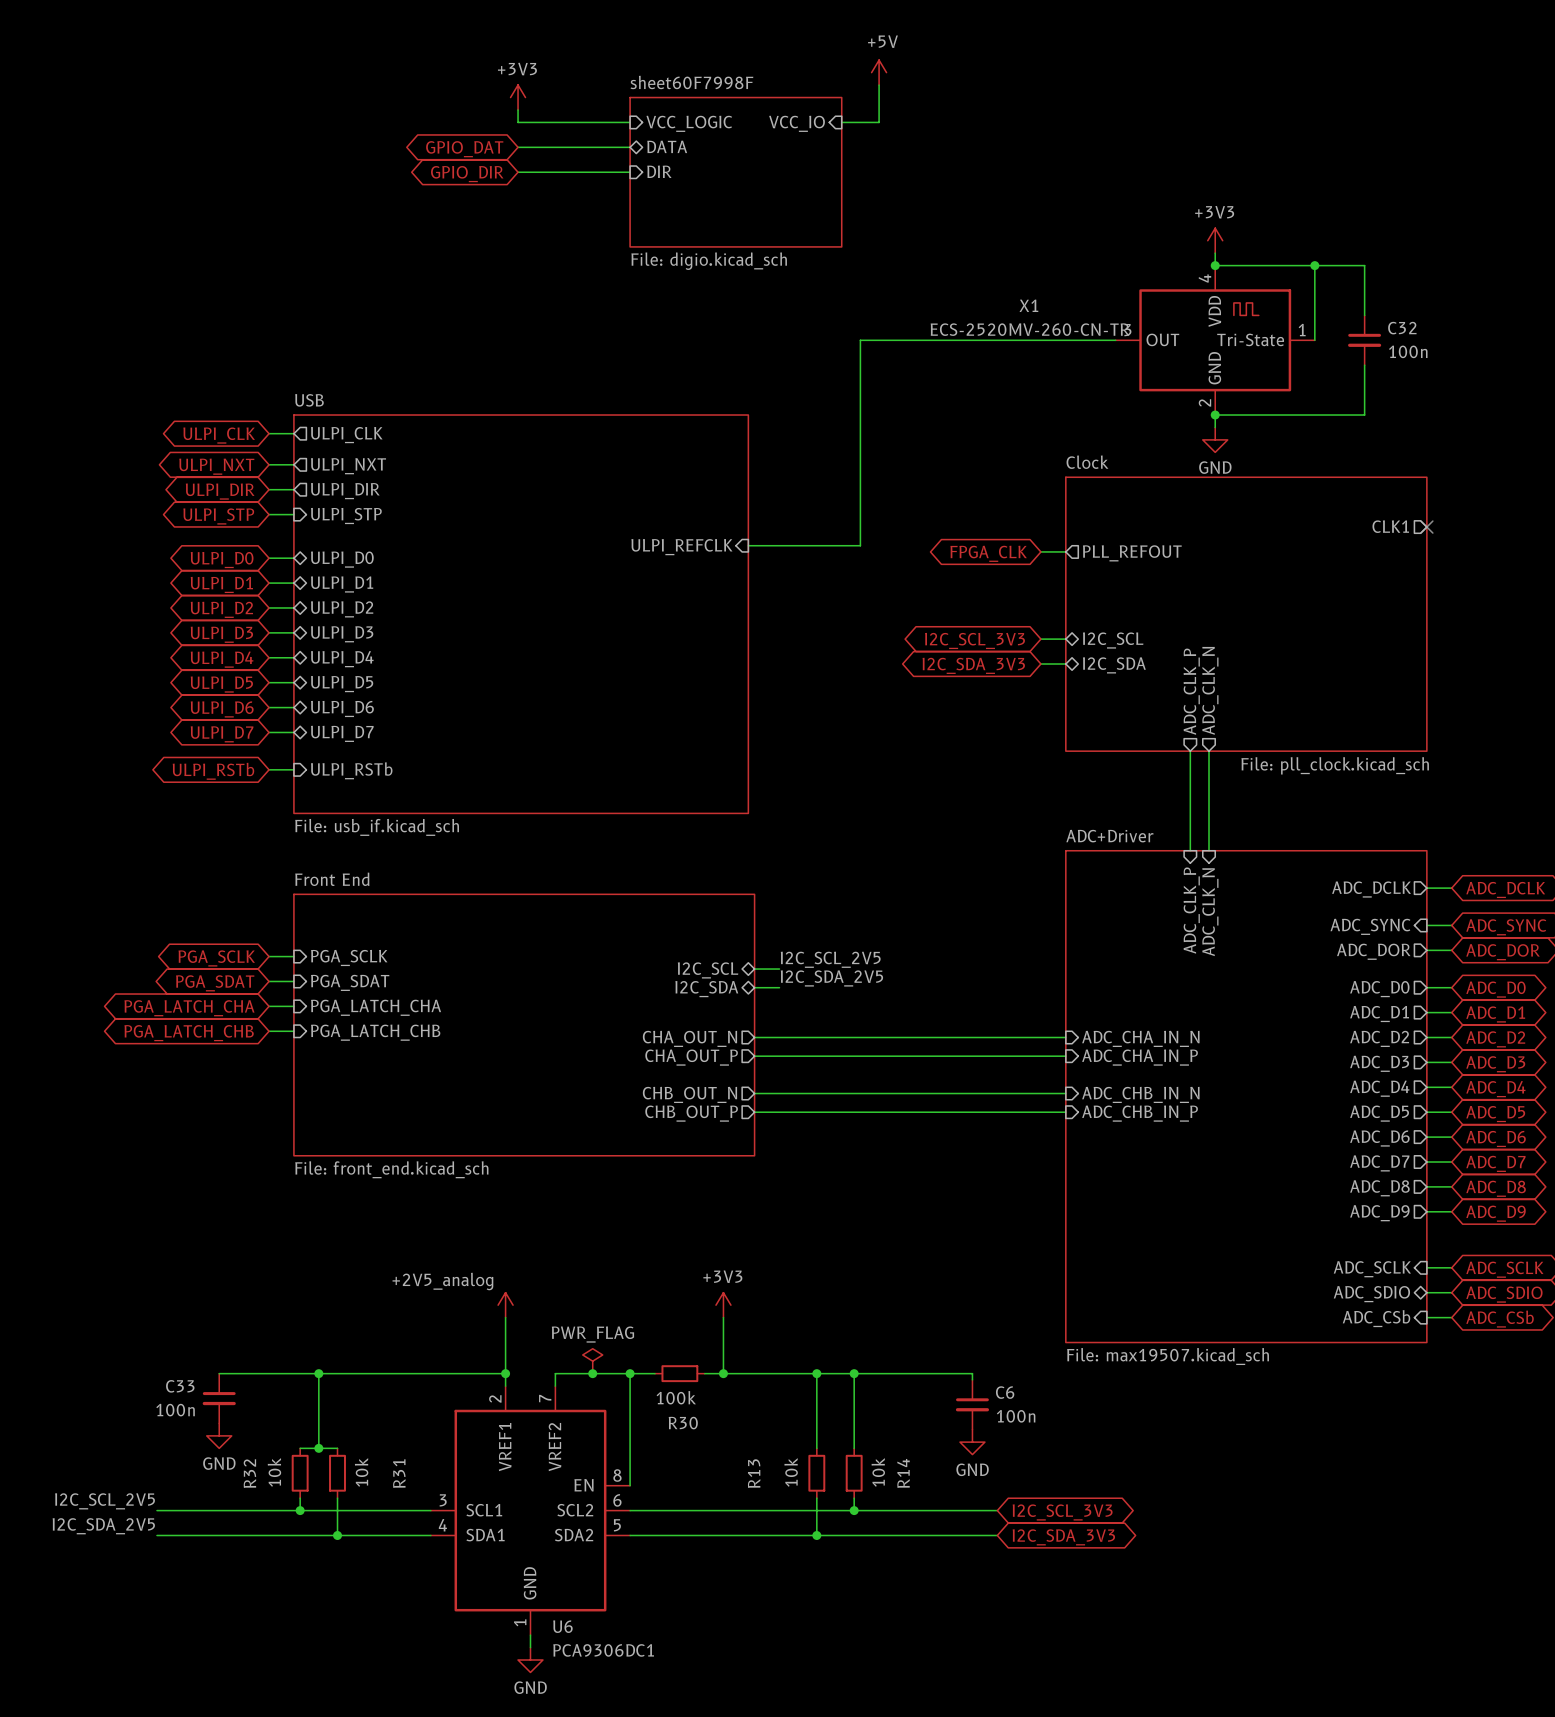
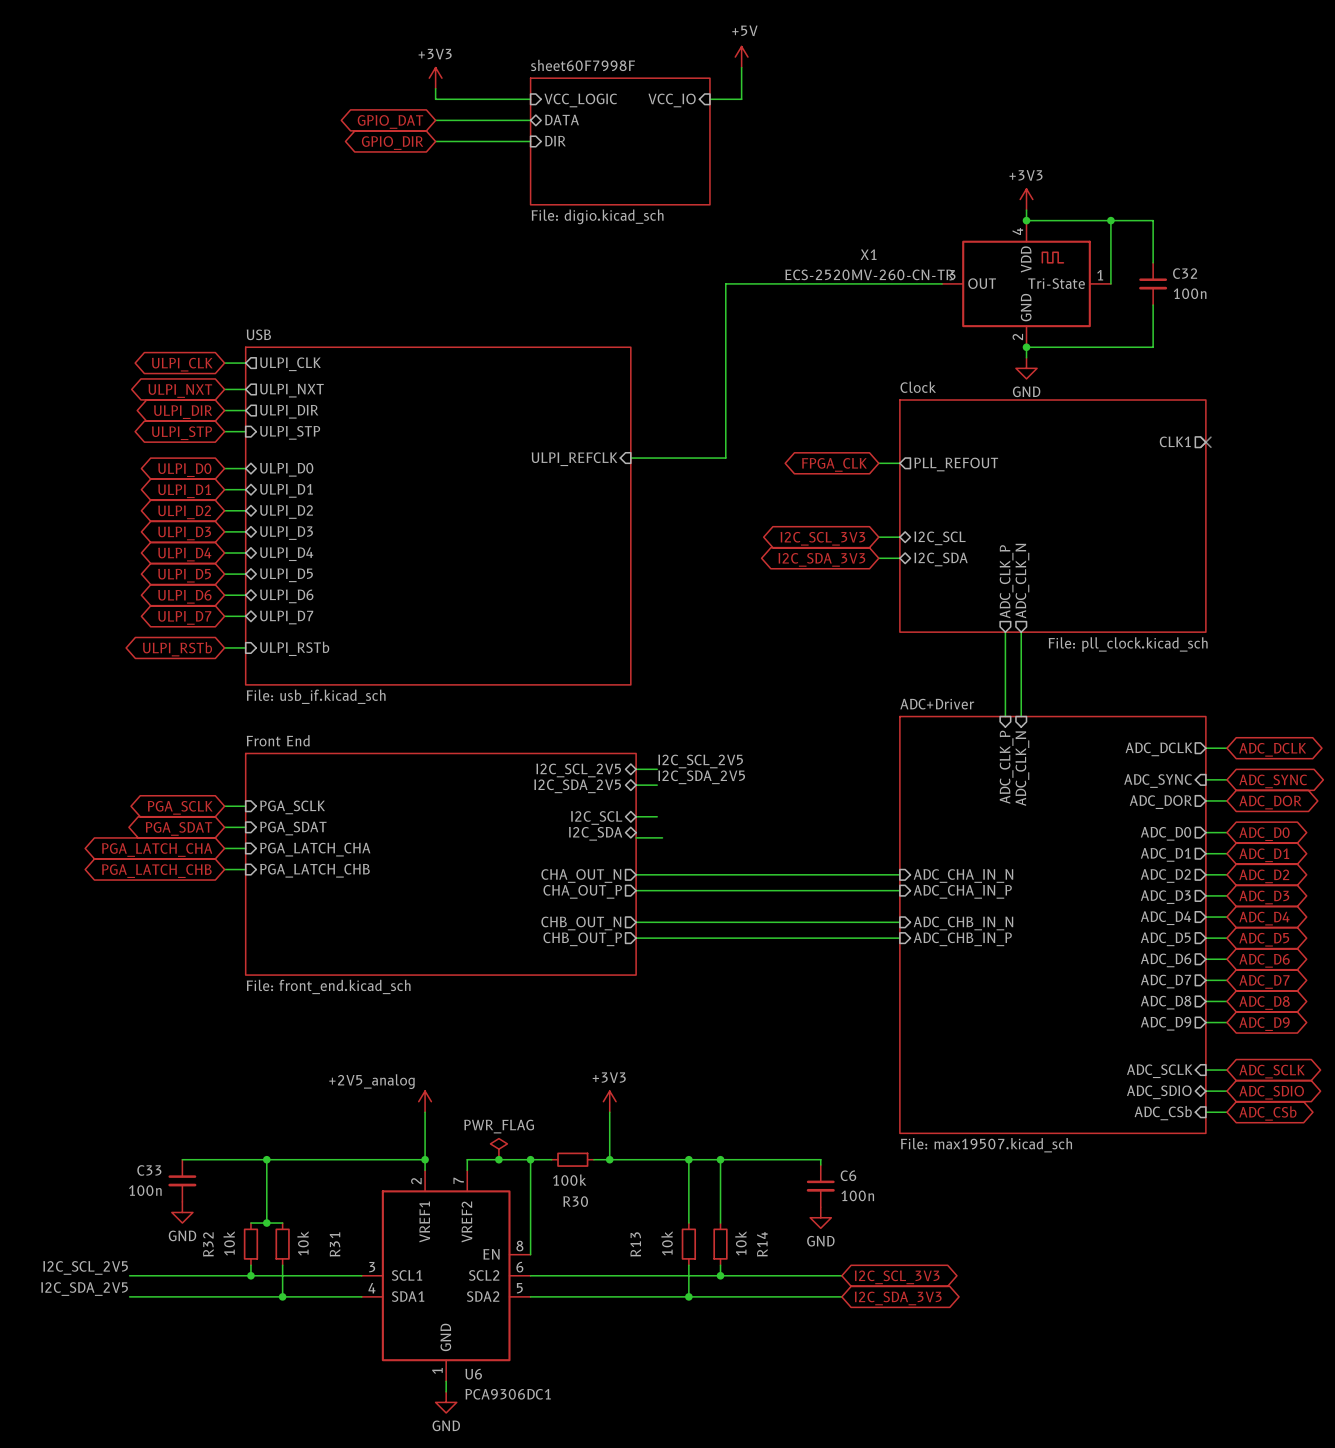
wire: none -> (636, 769) (657, 769)
sheet pin: none -> I2C_SCL_2V5 (578, 770)
sheet pin: none -> I2C_SDA_2V5 (577, 786)
label position: I2C_SCL_2V5 (830, 959) -> I2C_SCL_2V5 (700, 761)
label position: I2C_SDA_2V5 (831, 978) -> I2C_SDA_2V5 (701, 777)
wire: (754, 987) (779, 987) -> (636, 785) (657, 785)
wire: none -> (636, 837) (662, 837)

